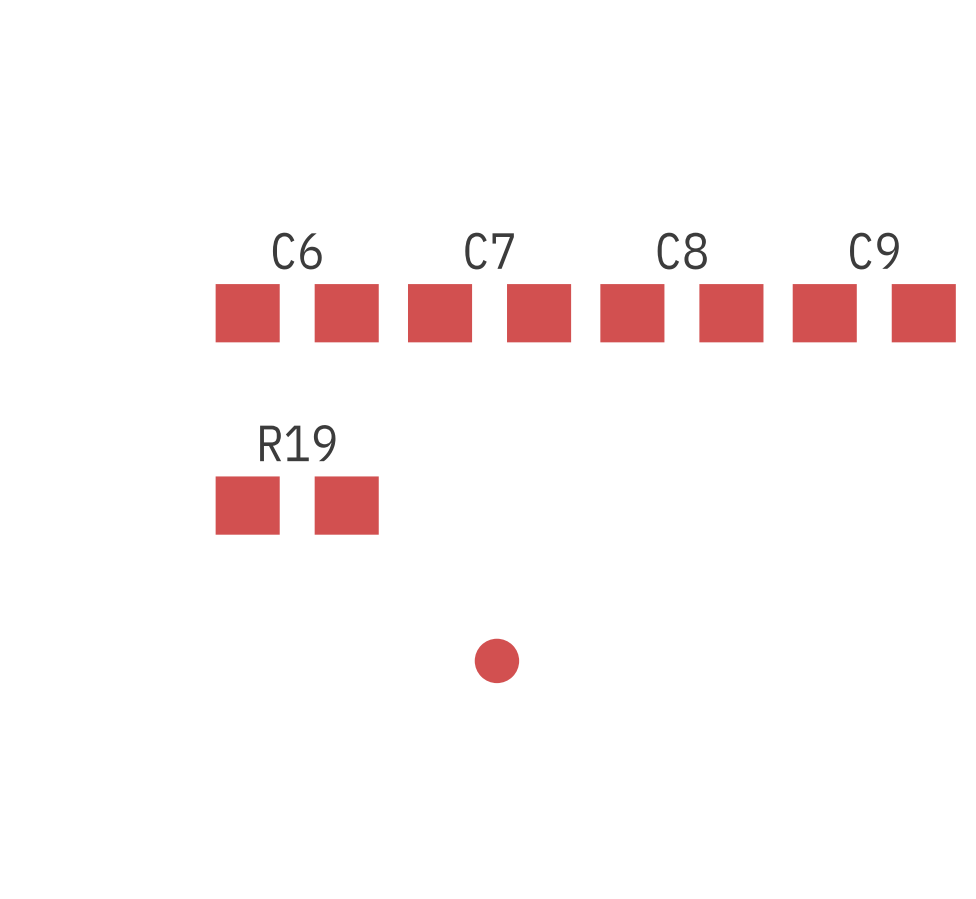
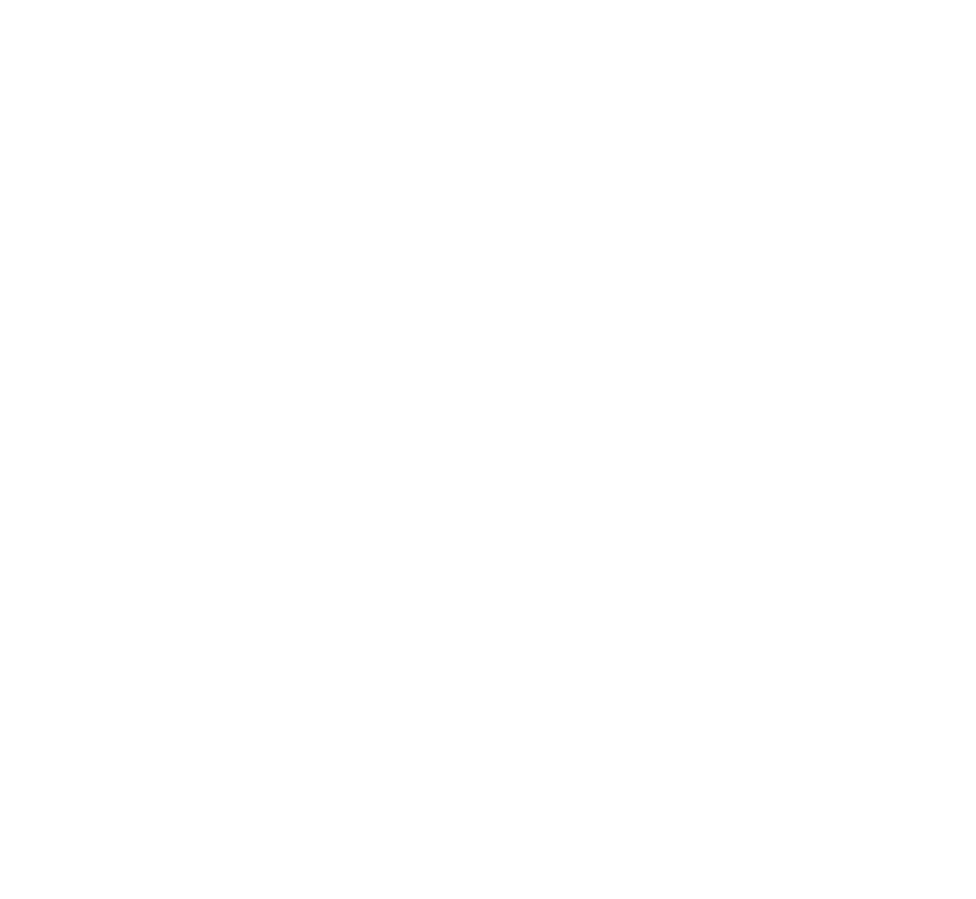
C6: (297, 313) -> none
C7: (489, 313) -> none
C8: (681, 313) -> none
C9: (874, 313) -> none
R19: (297, 505) -> none
part: (496, 660) -> none

